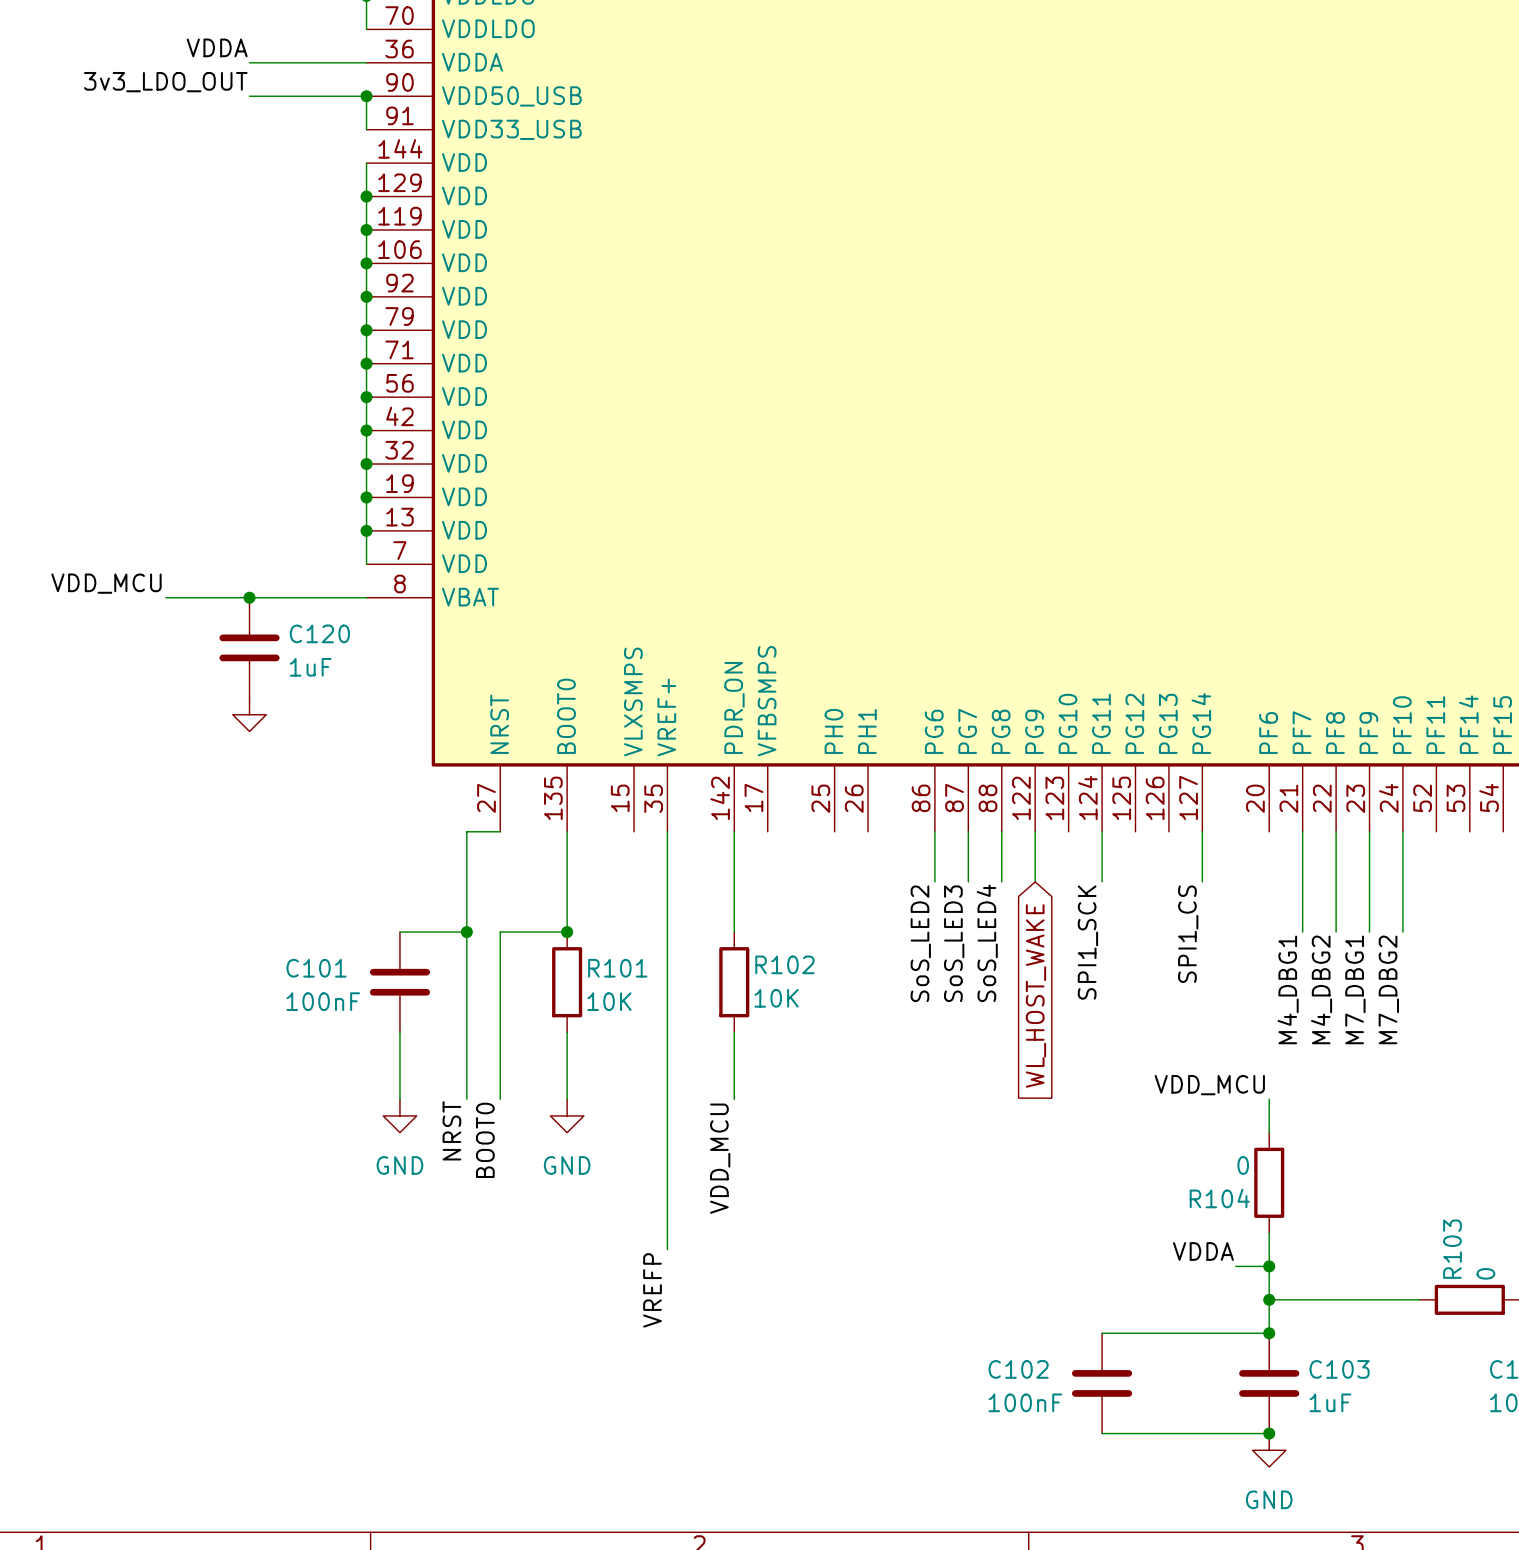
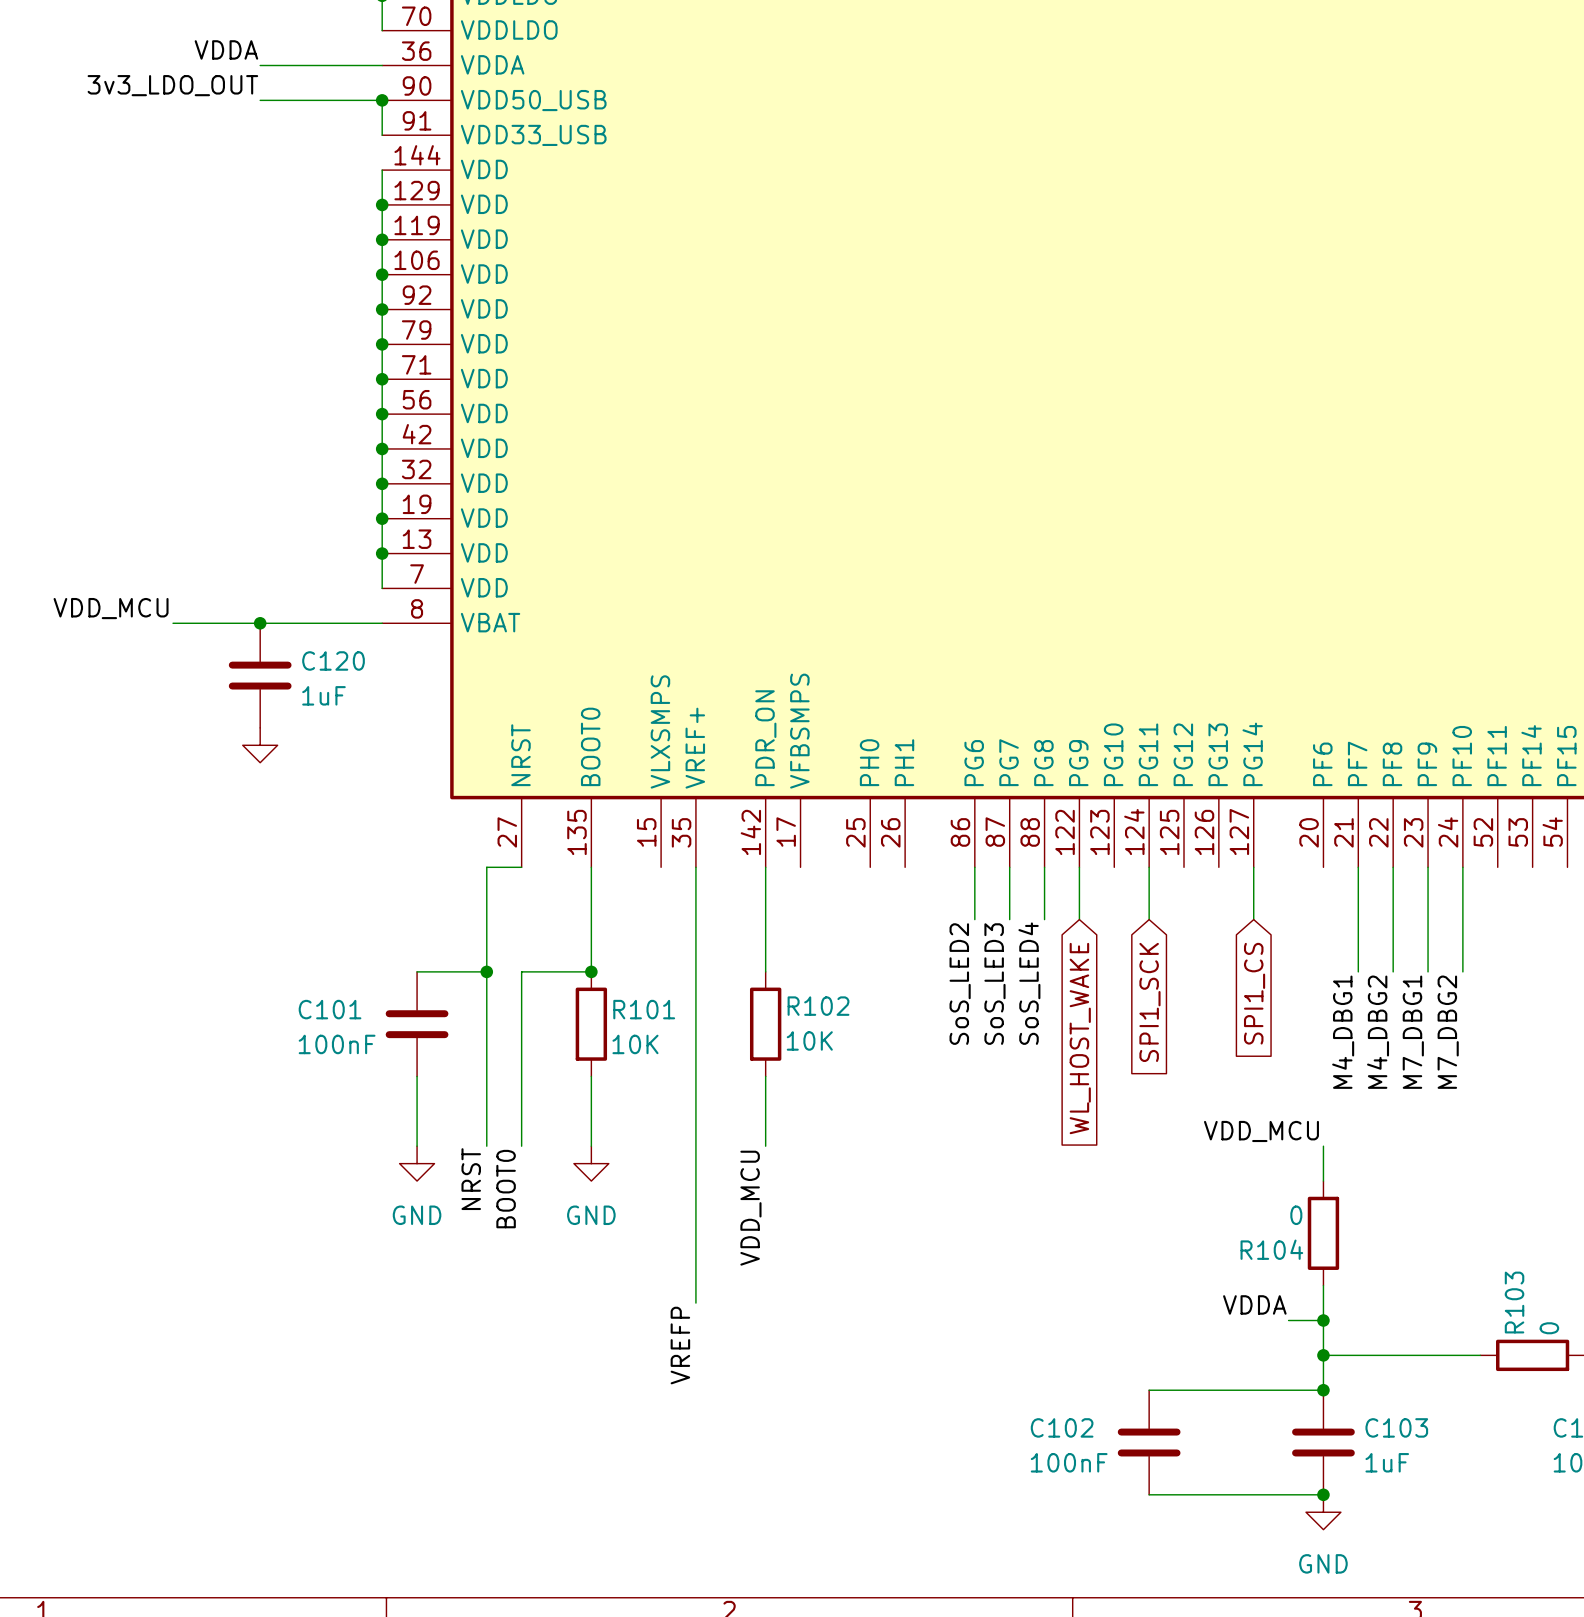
label: SPI1_CS (1188, 934) -> none
label: SPI1_SCK (1087, 942) -> none
global label: none -> SPI1_CS (1254, 993)
global label: none -> SPI1_SCK (1149, 1002)

